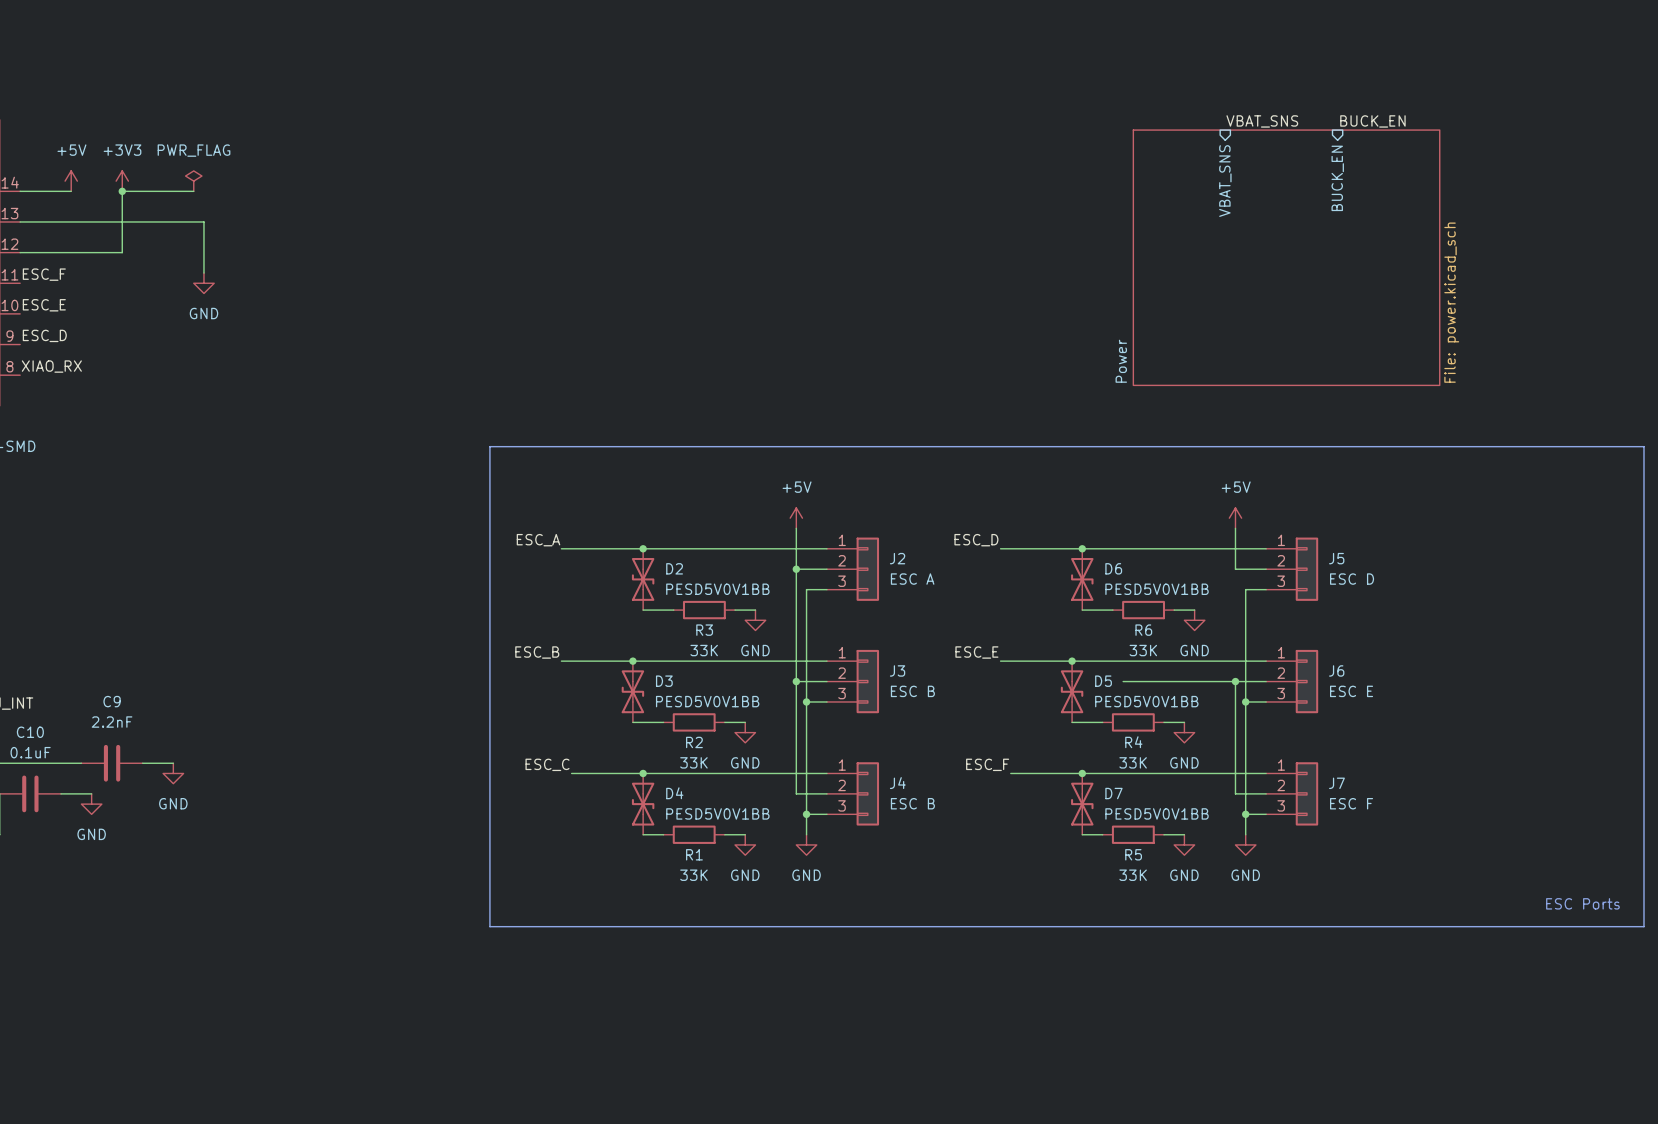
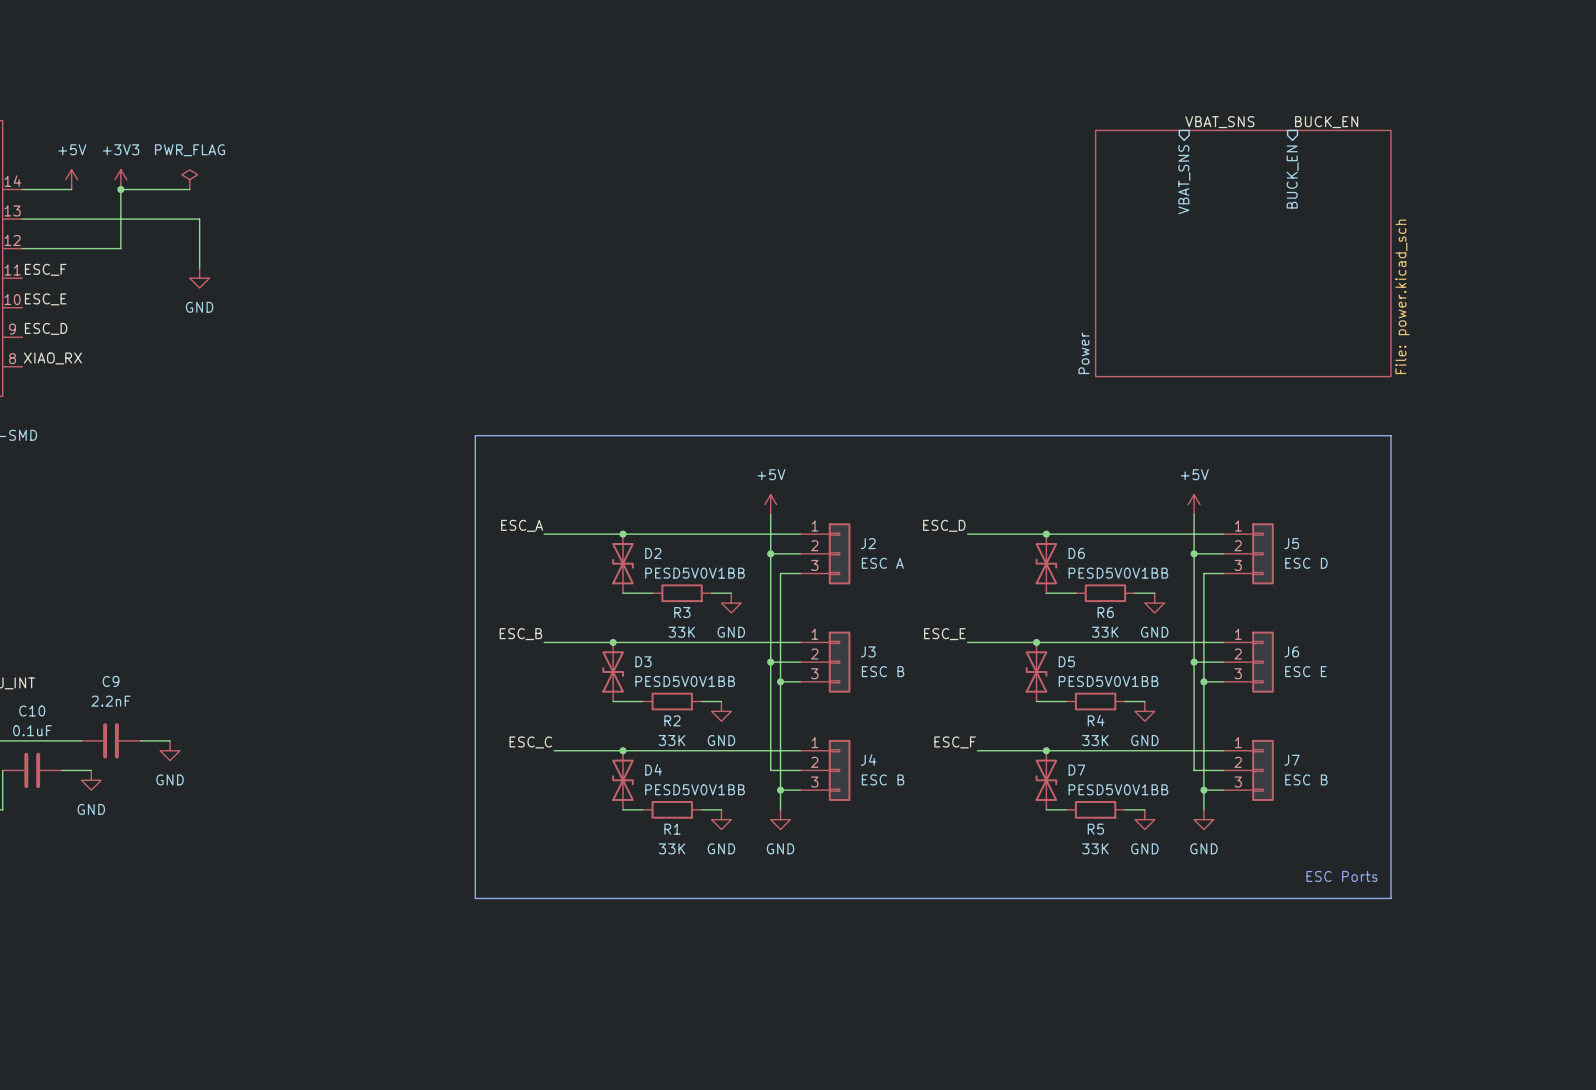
line: (1439, 446) (1643, 446) (1643, 926) (1439, 926) -> (1390, 435) (1390, 898)
junction: none -> (1194, 553)
wire: (1123, 681) (1235, 681) -> (1194, 553) (1194, 662)
J7 value: ESC F (1351, 803) -> ESC B (1306, 779)
text position: ESC Ports (1582, 903) -> ESC Ports (1342, 876)

